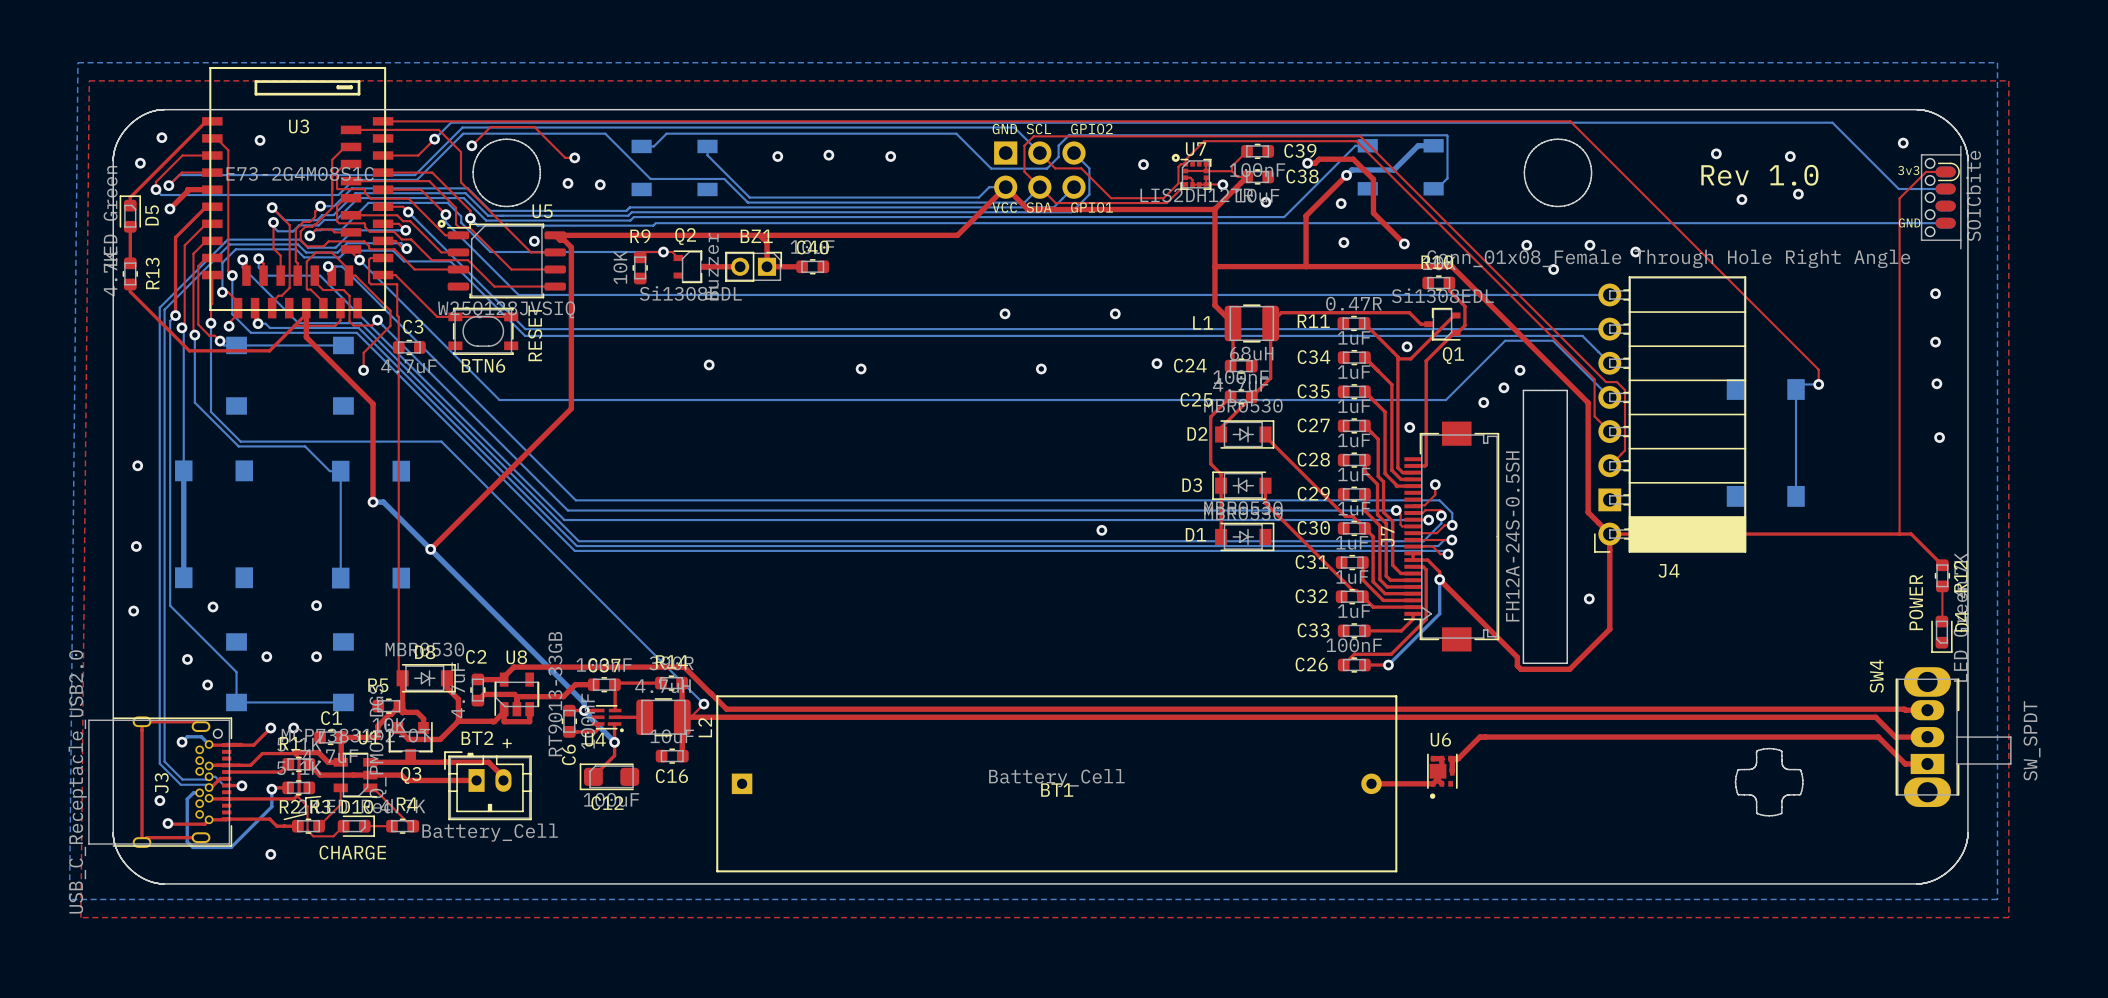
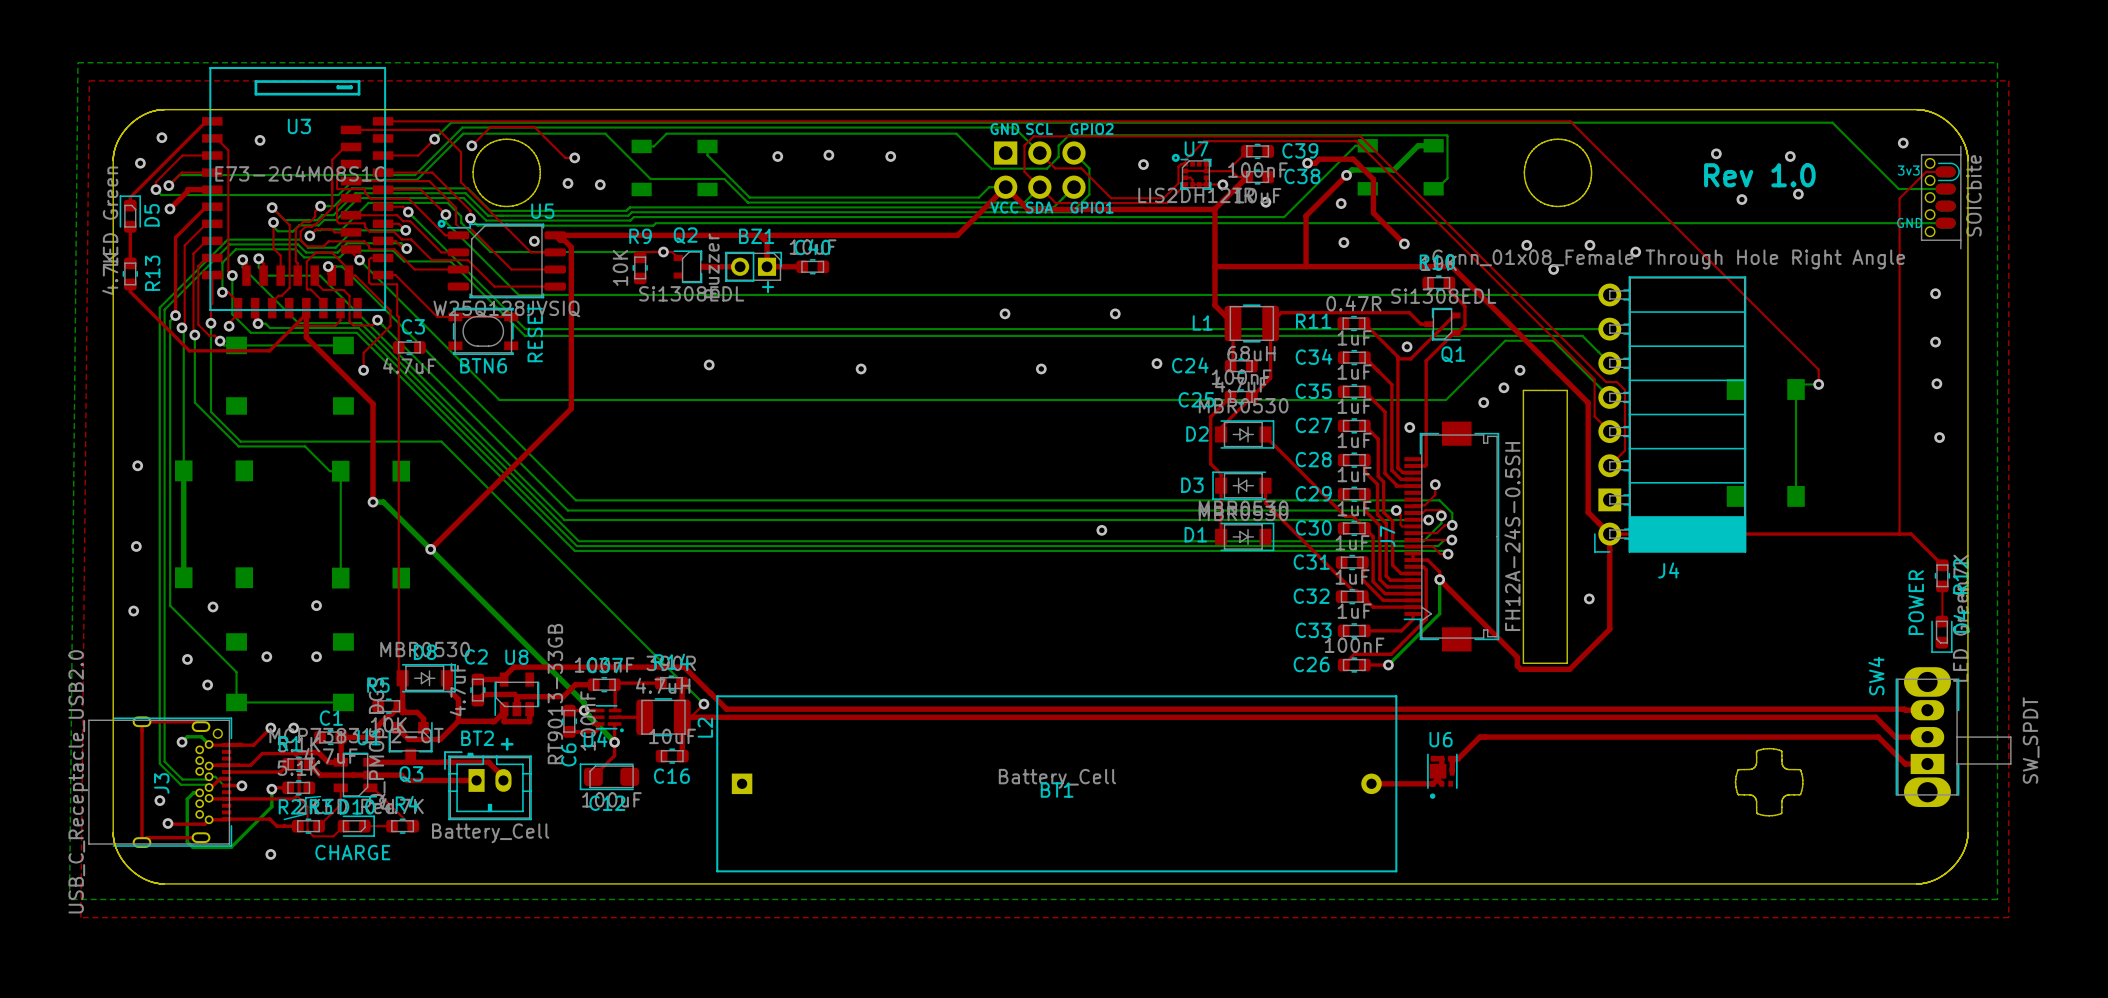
text: none -> + (768, 287)

